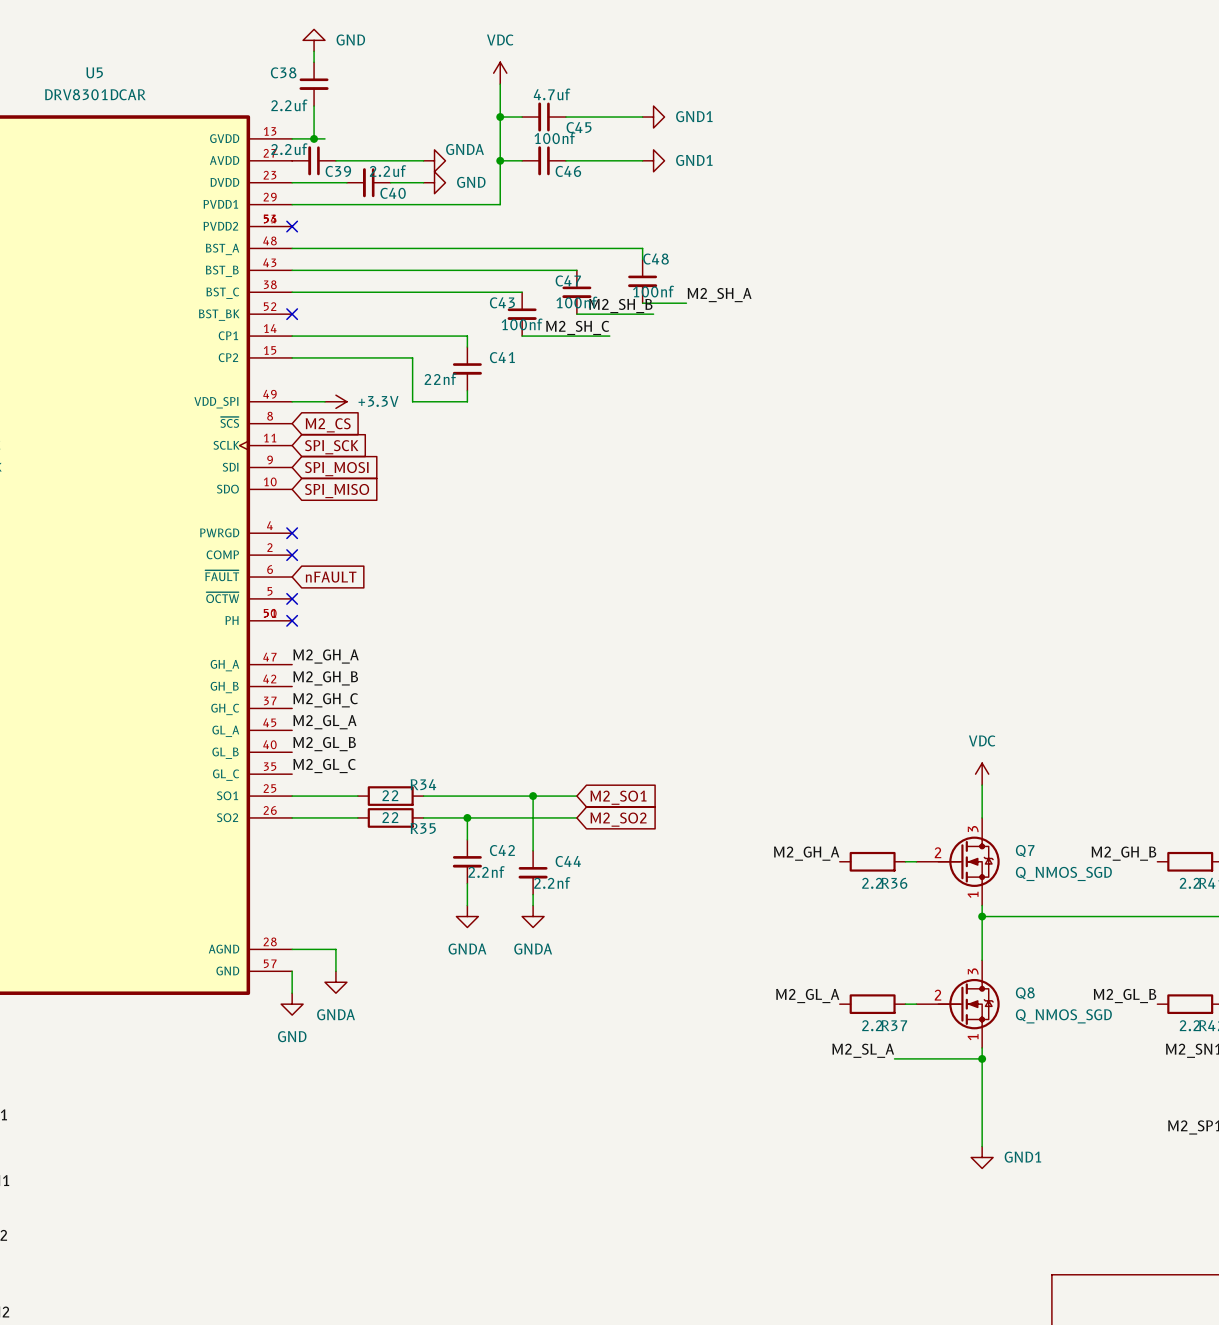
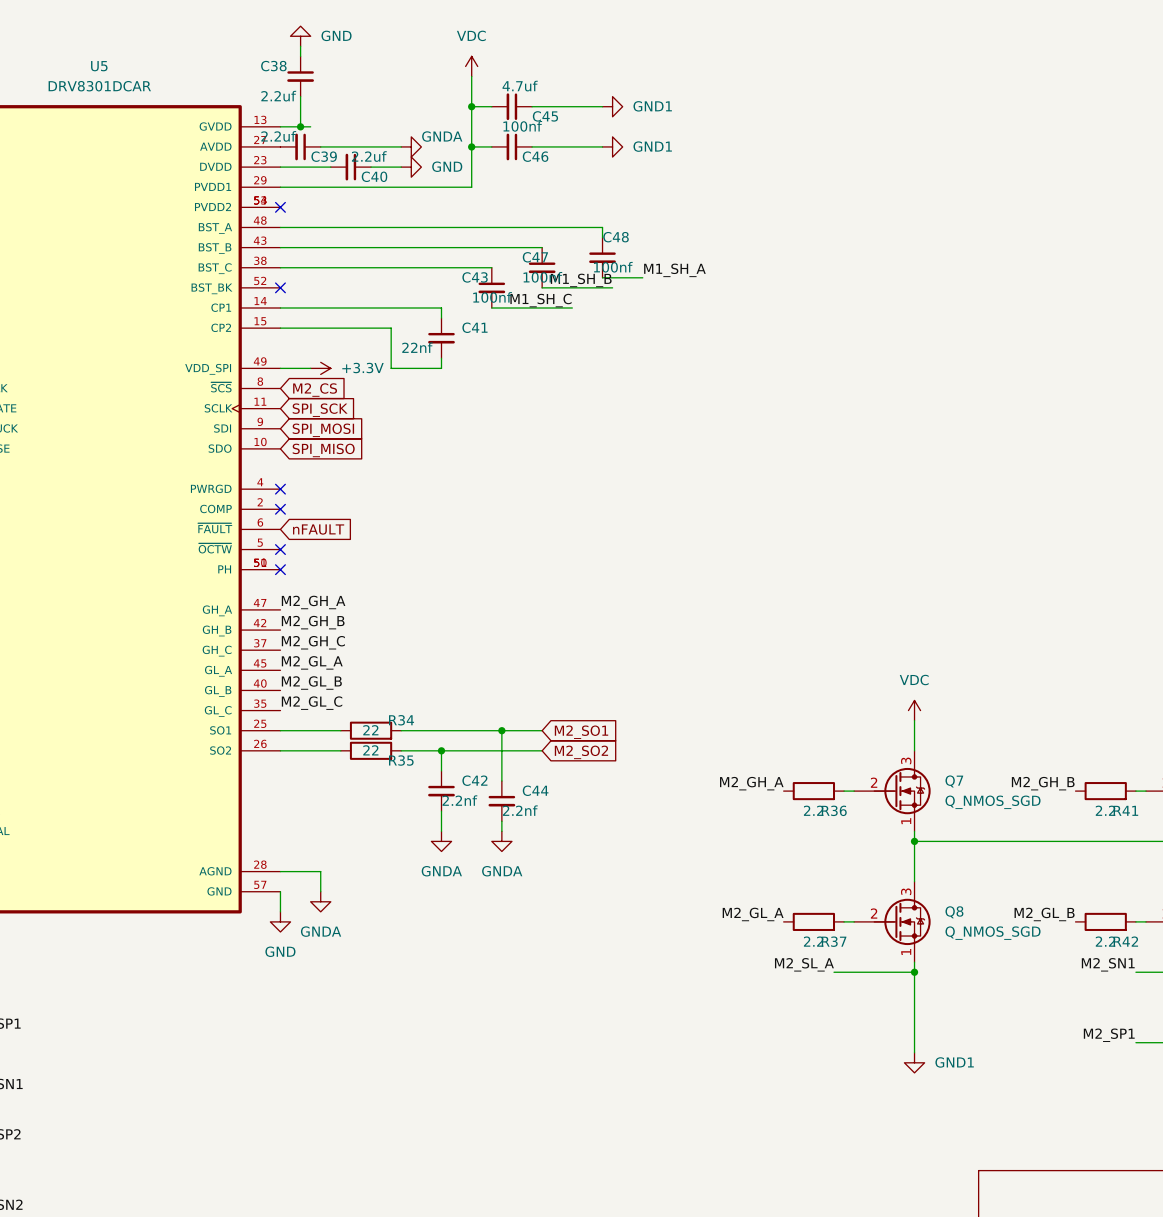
label: M2_SH_A (719, 295) -> M1_SH_A (674, 270)
label: M2_SH_B (620, 306) -> M1_SH_B (581, 280)
label: M2_SH_C (577, 327) -> M1_SH_C (540, 300)

